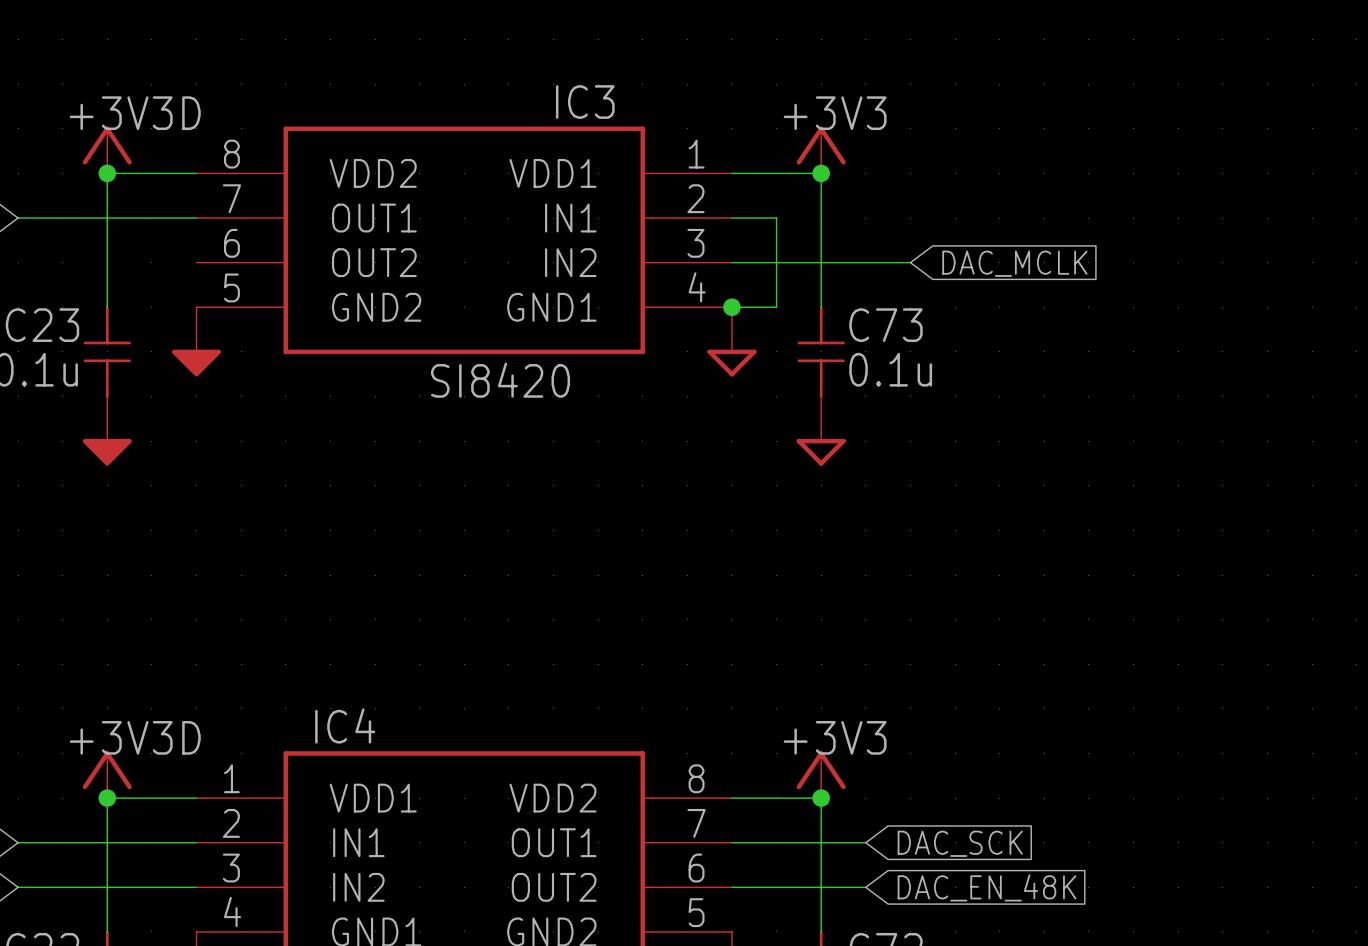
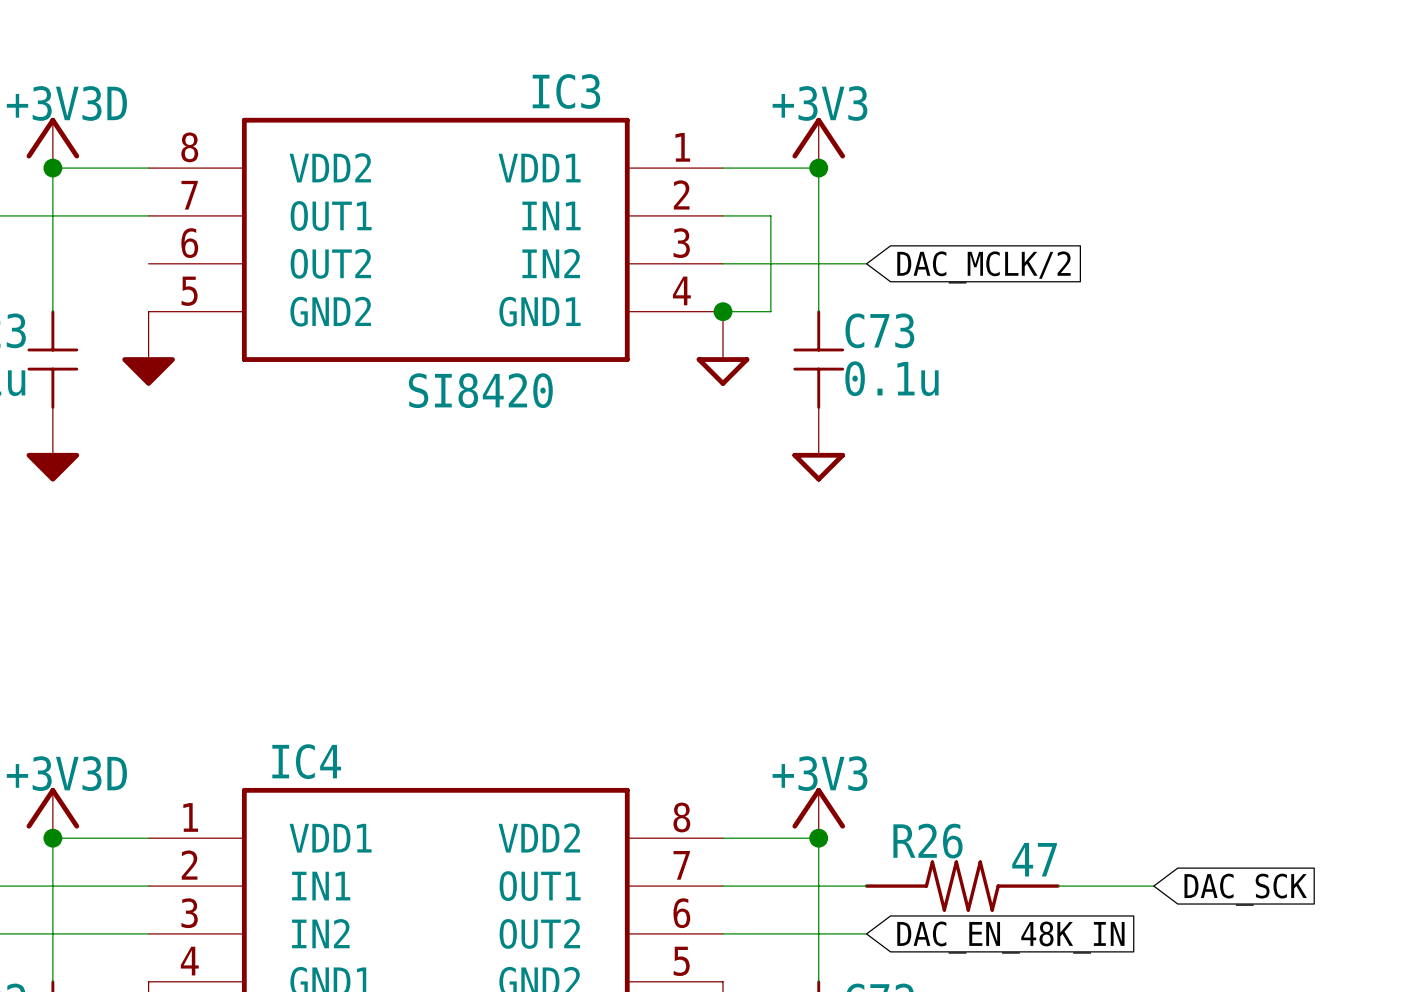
wire: (865, 262) (910, 262) -> none
global label: DAC_MCLK (1014, 263) -> DAC_MCLK/2 (983, 267)
R26: none -> 47 (962, 886)
wire: none -> (1058, 886) (1153, 886)
global label position: DAC_SCK (960, 843) -> DAC_SCK (1245, 889)
global label: DAC_EN_48K (987, 887) -> DAC_EN_48K_IN (1010, 937)

